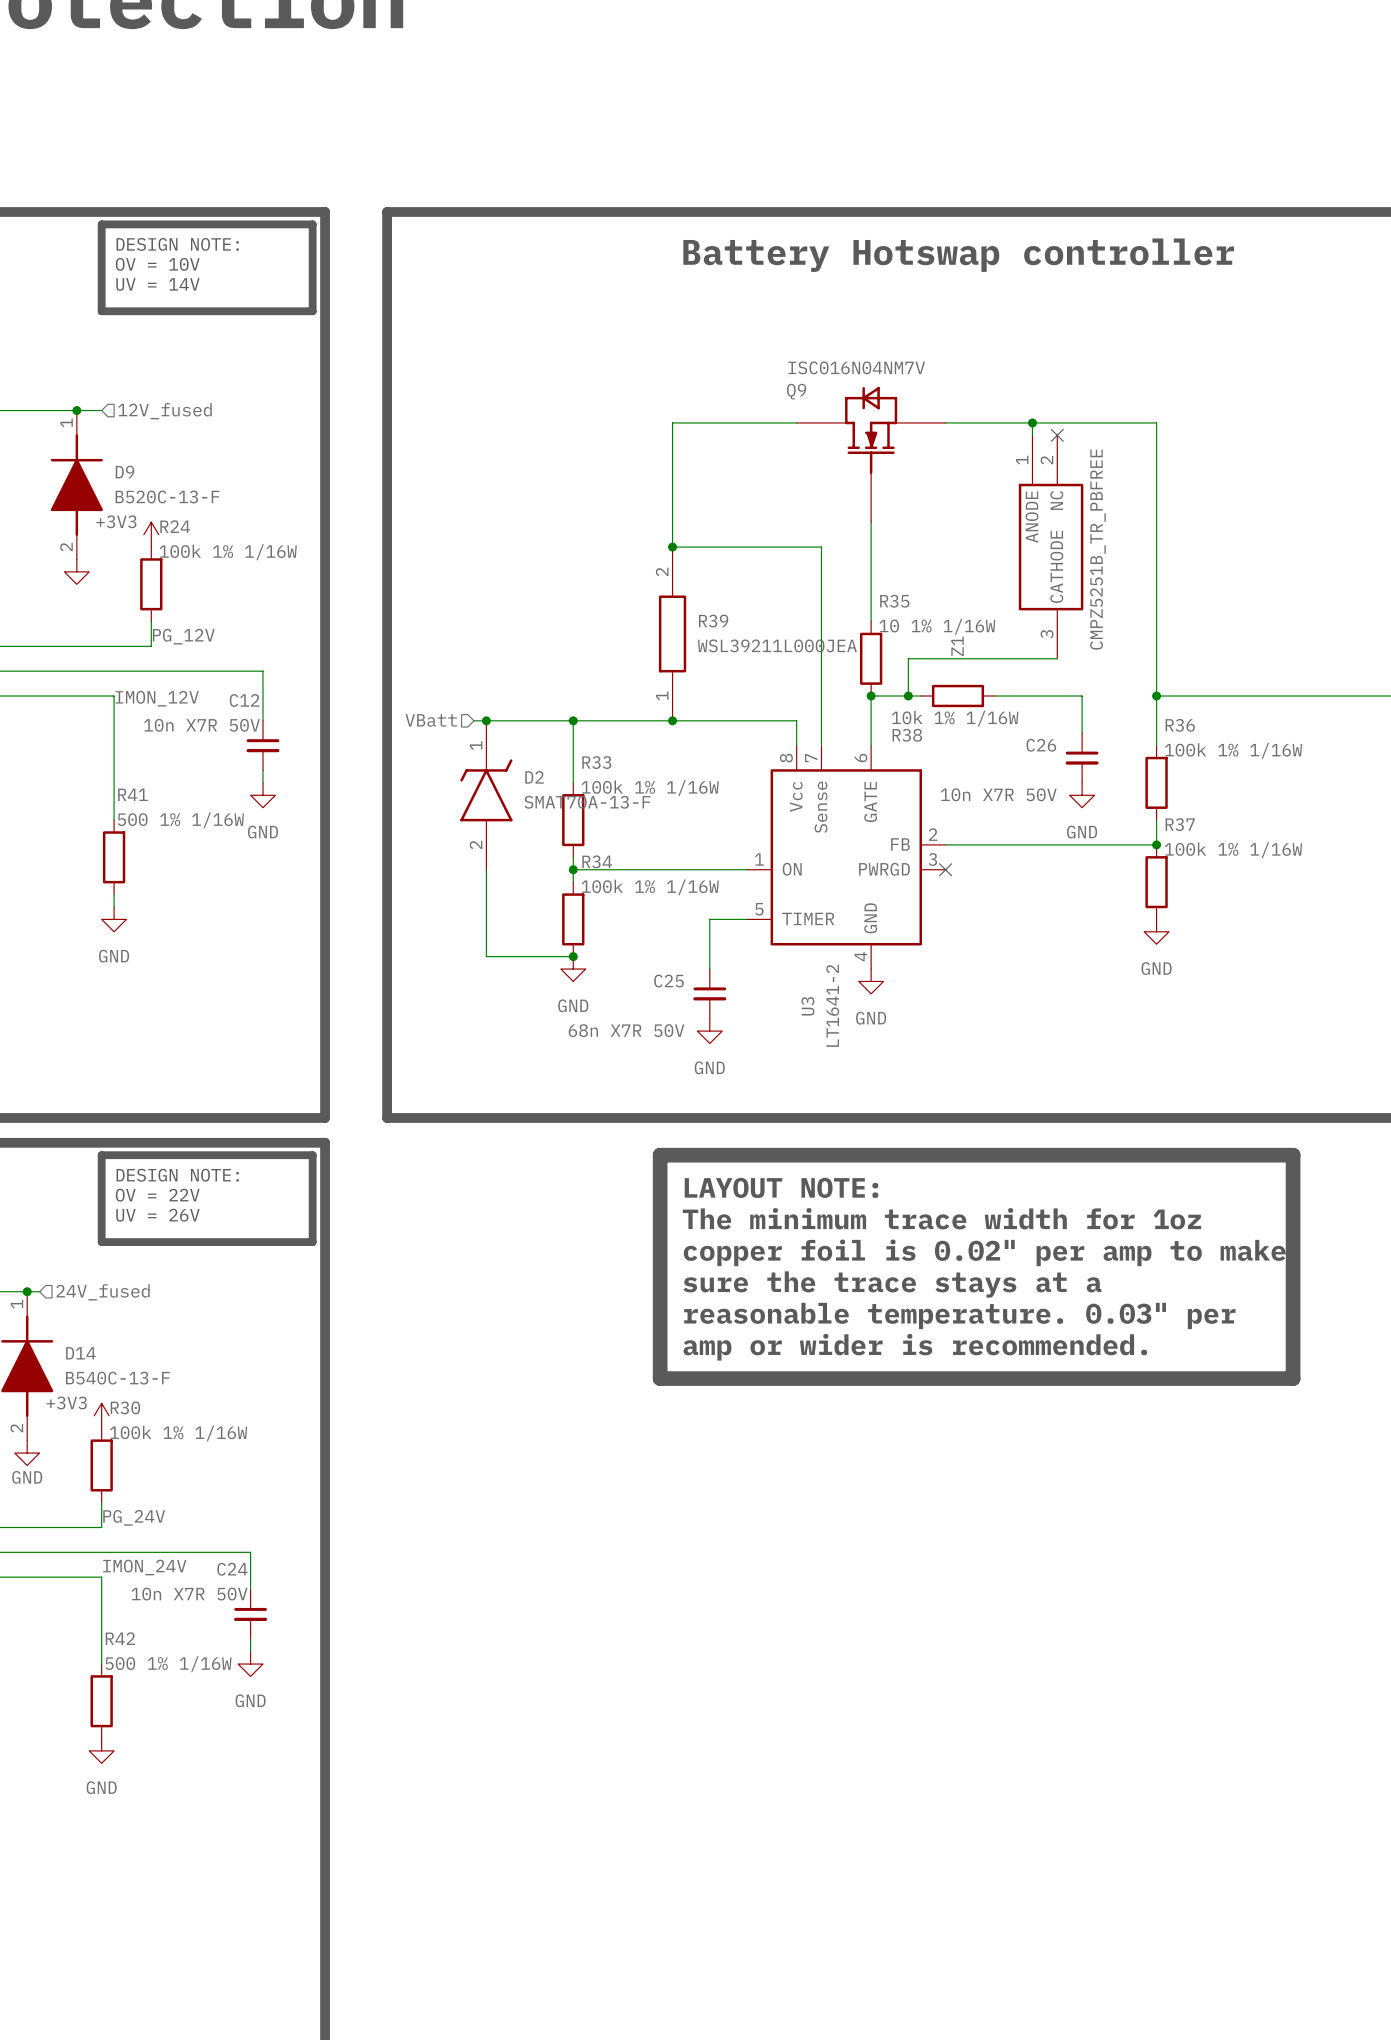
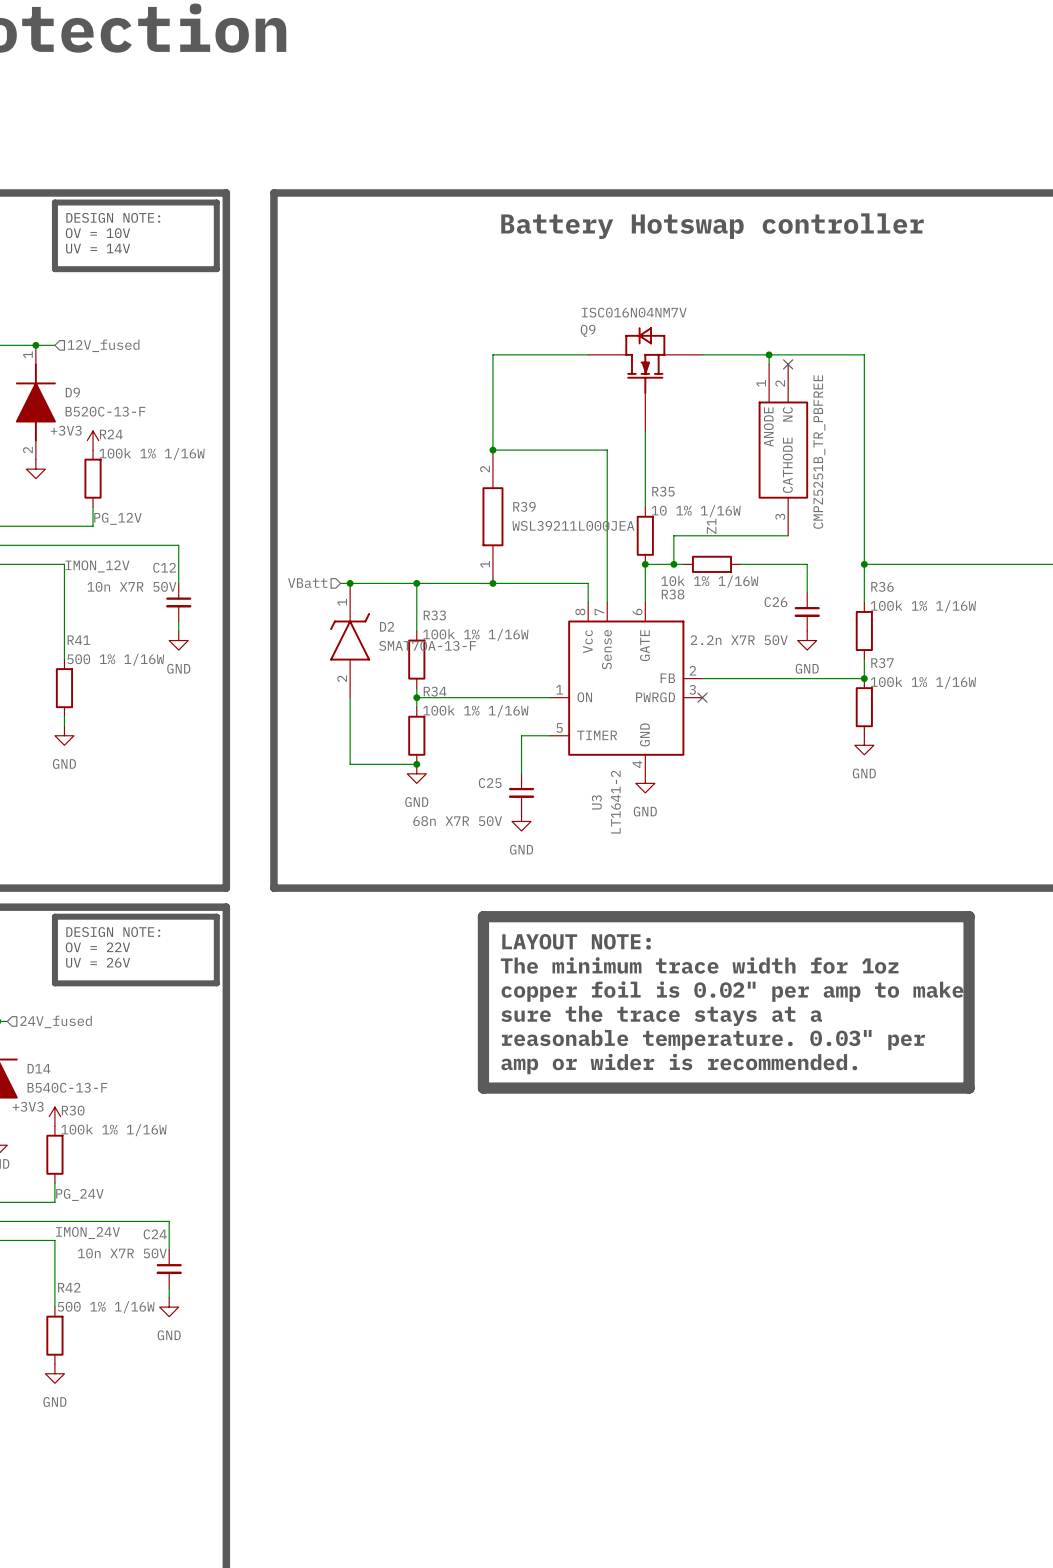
C26 value: 10n X7R 50V (998, 794) -> 2.2n X7R 50V (739, 640)

